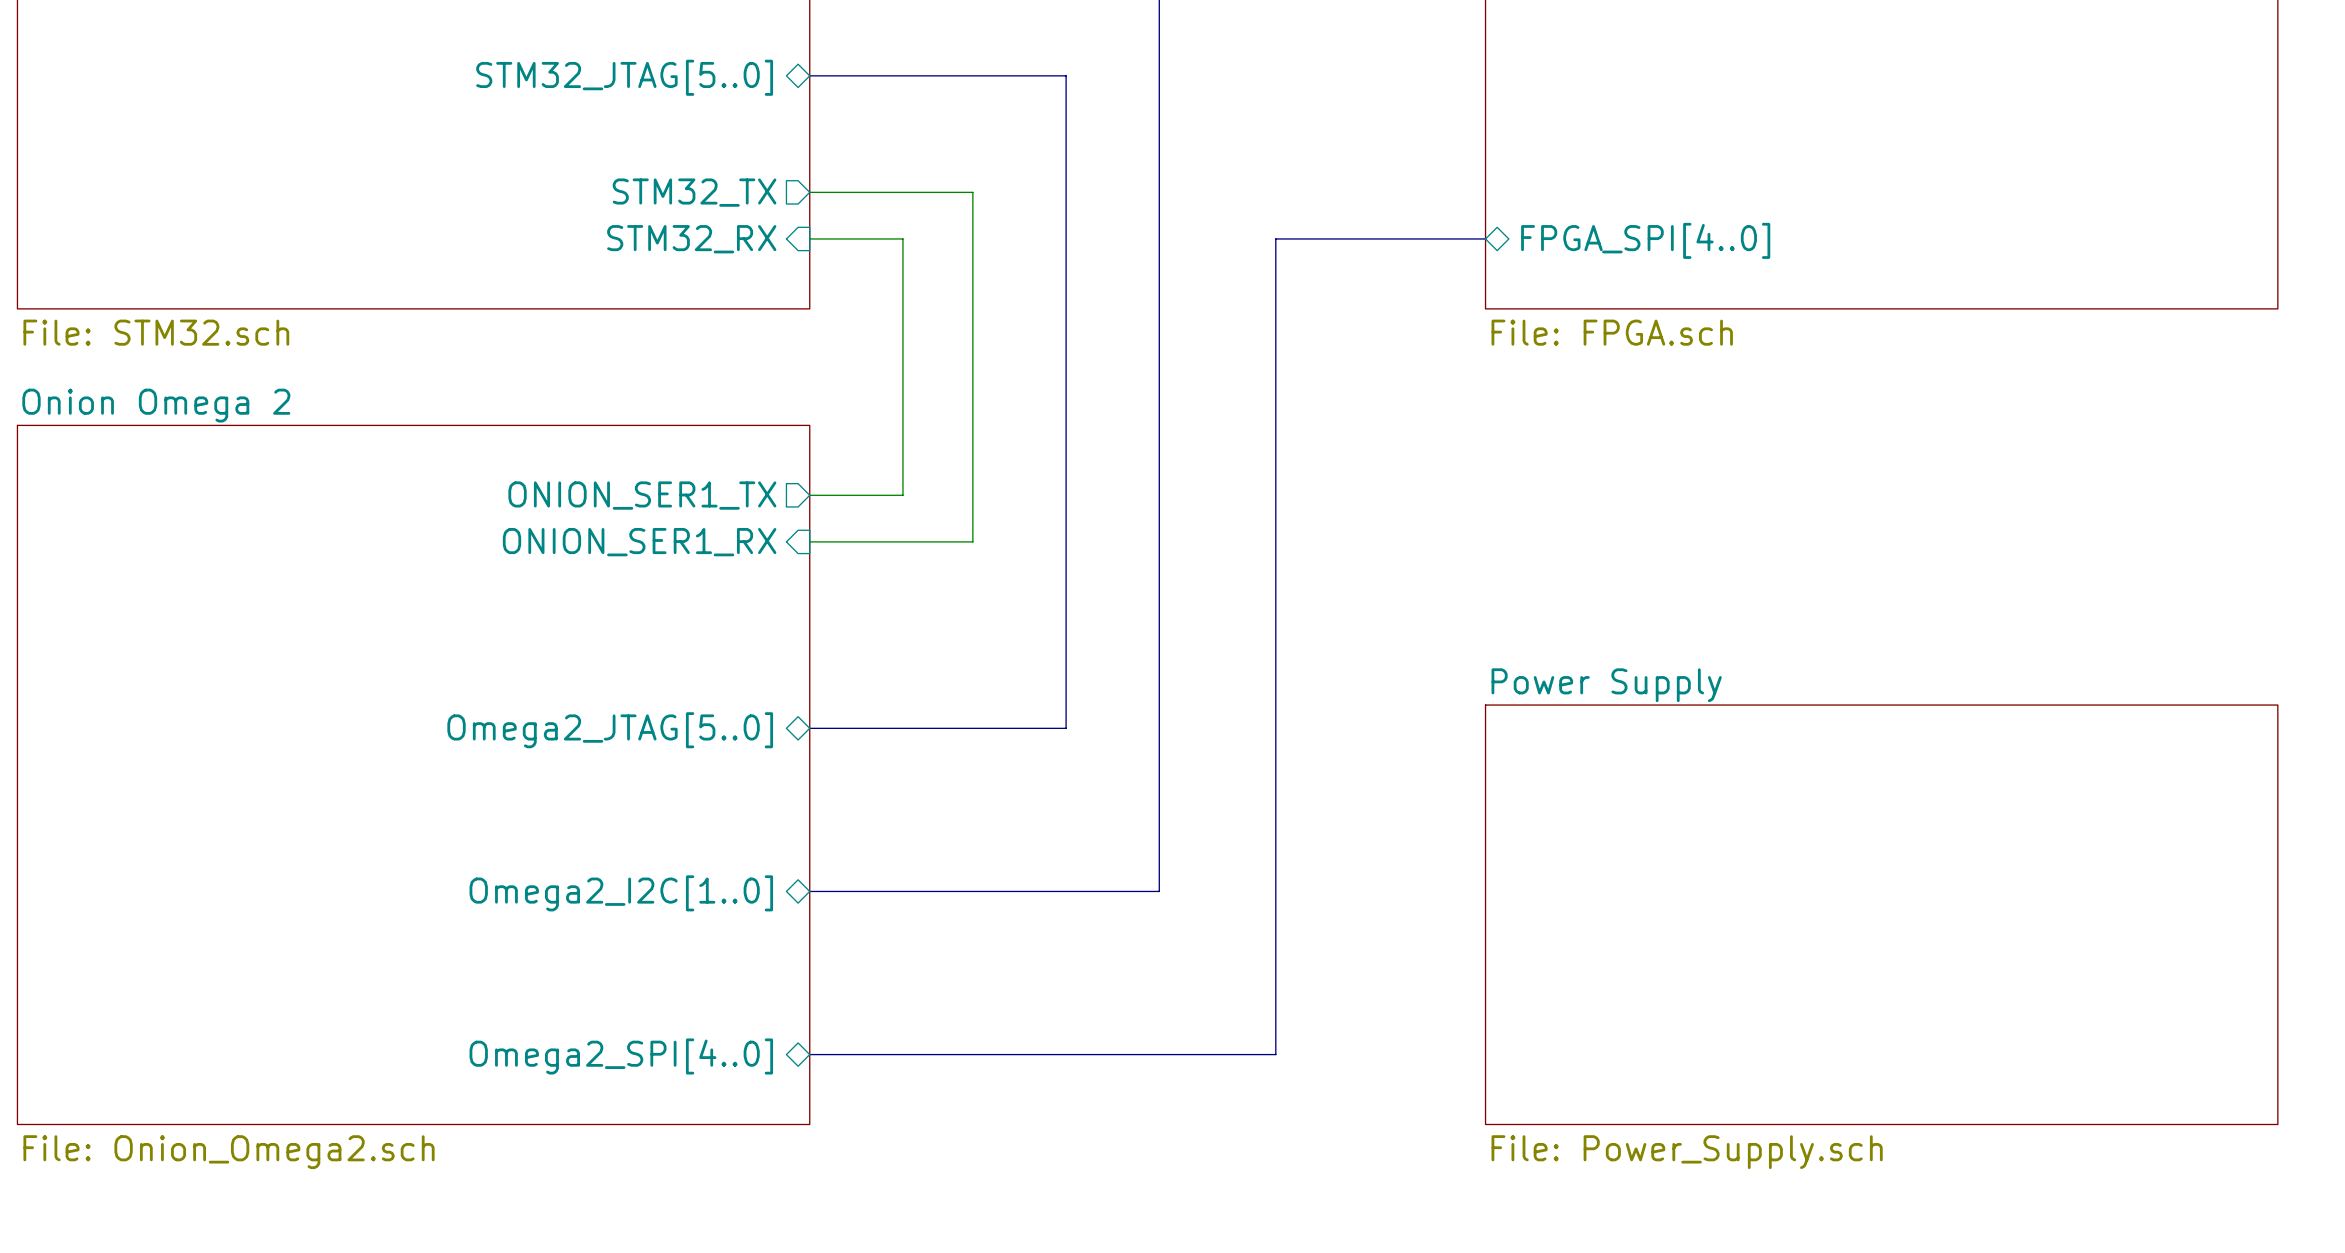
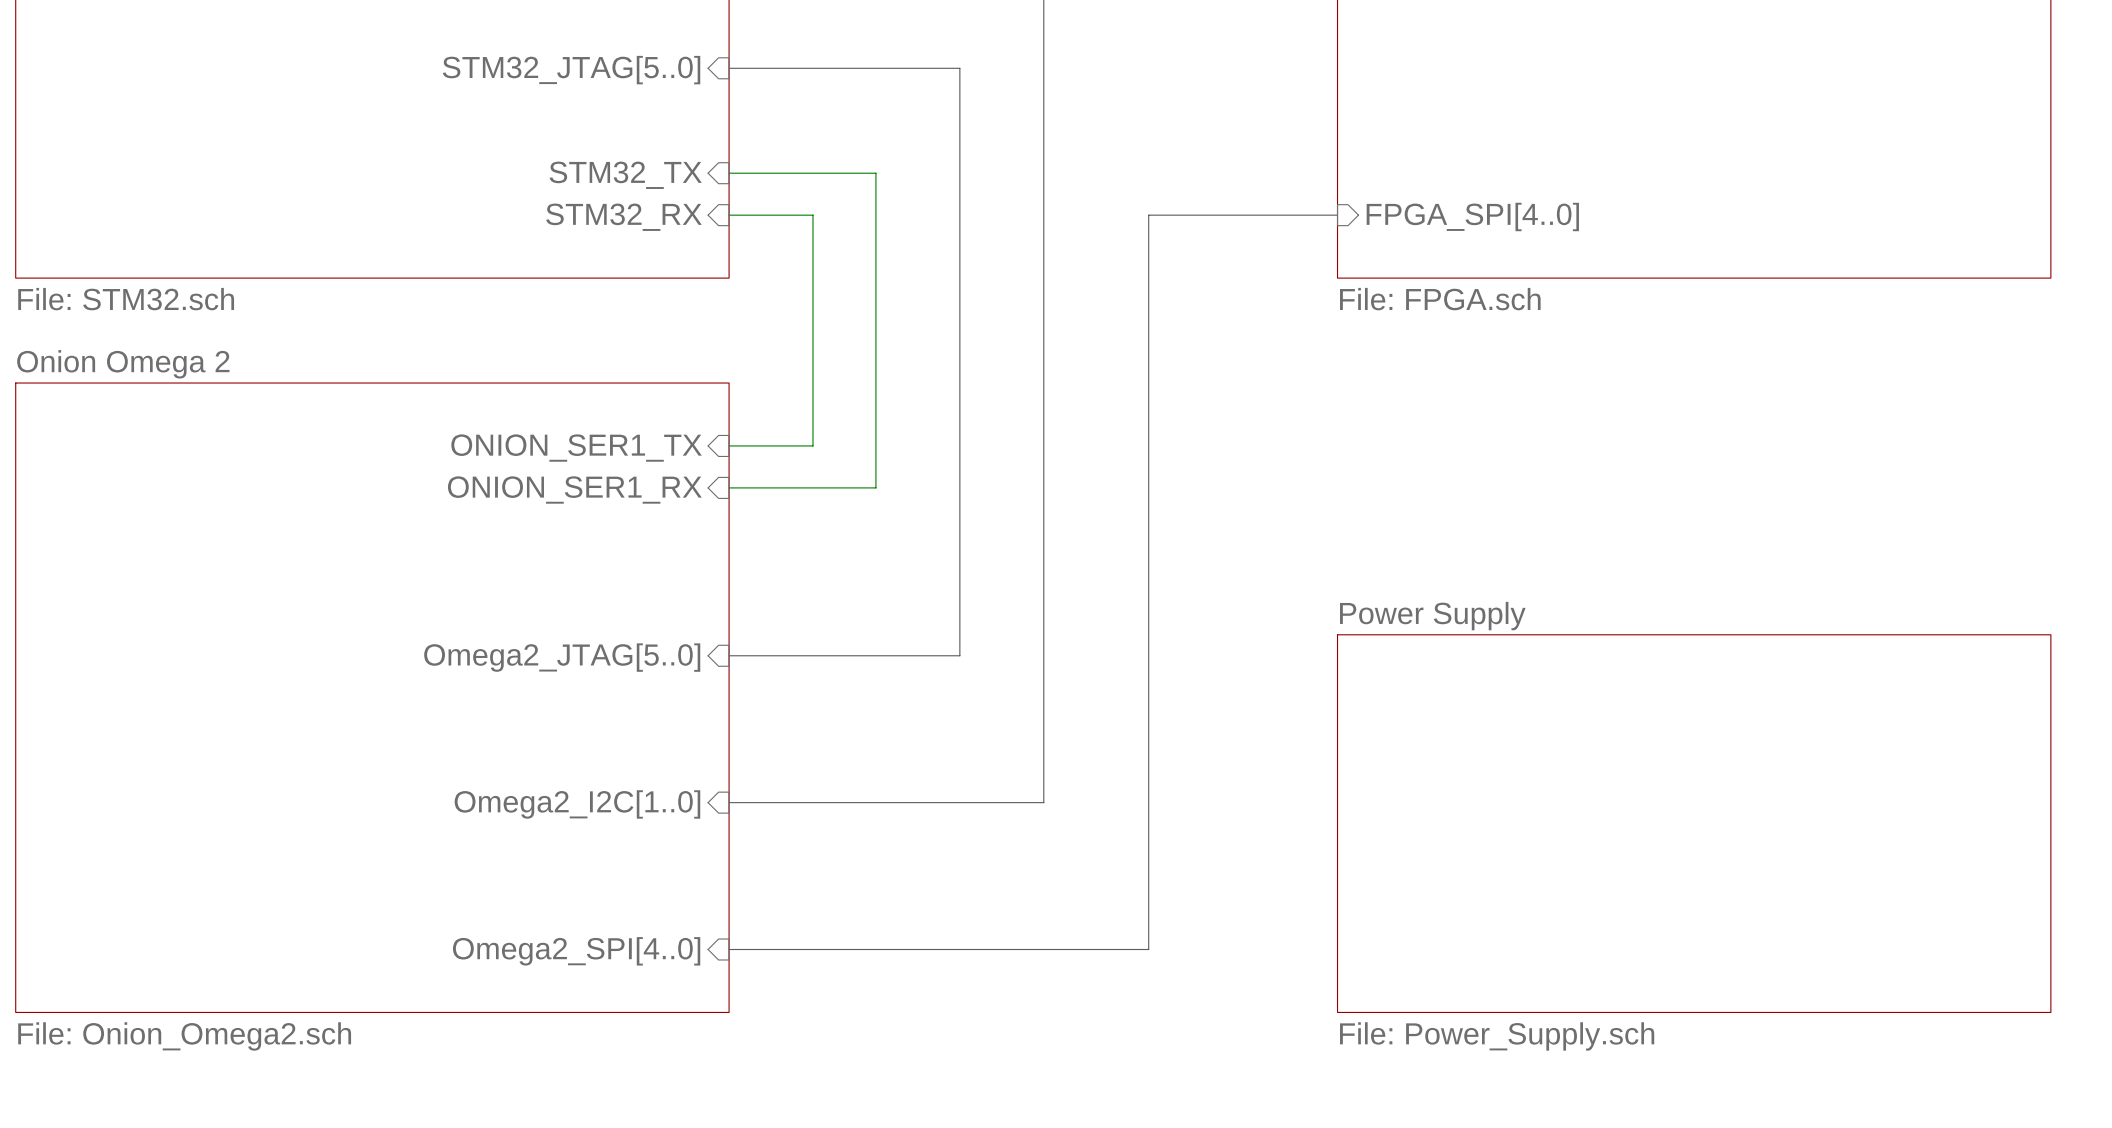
sheet pin shape: bidirectional (624, 77) -> input (571, 70)
sheet pin shape: output (694, 192) -> input (625, 175)
sheet pin shape: bidirectional (1645, 240) -> input (1472, 216)
sheet pin shape: output (642, 495) -> input (576, 448)
sheet pin shape: bidirectional (610, 730) -> input (562, 657)
sheet pin shape: bidirectional (621, 893) -> input (577, 804)
sheet pin shape: bidirectional (621, 1056) -> input (576, 951)

